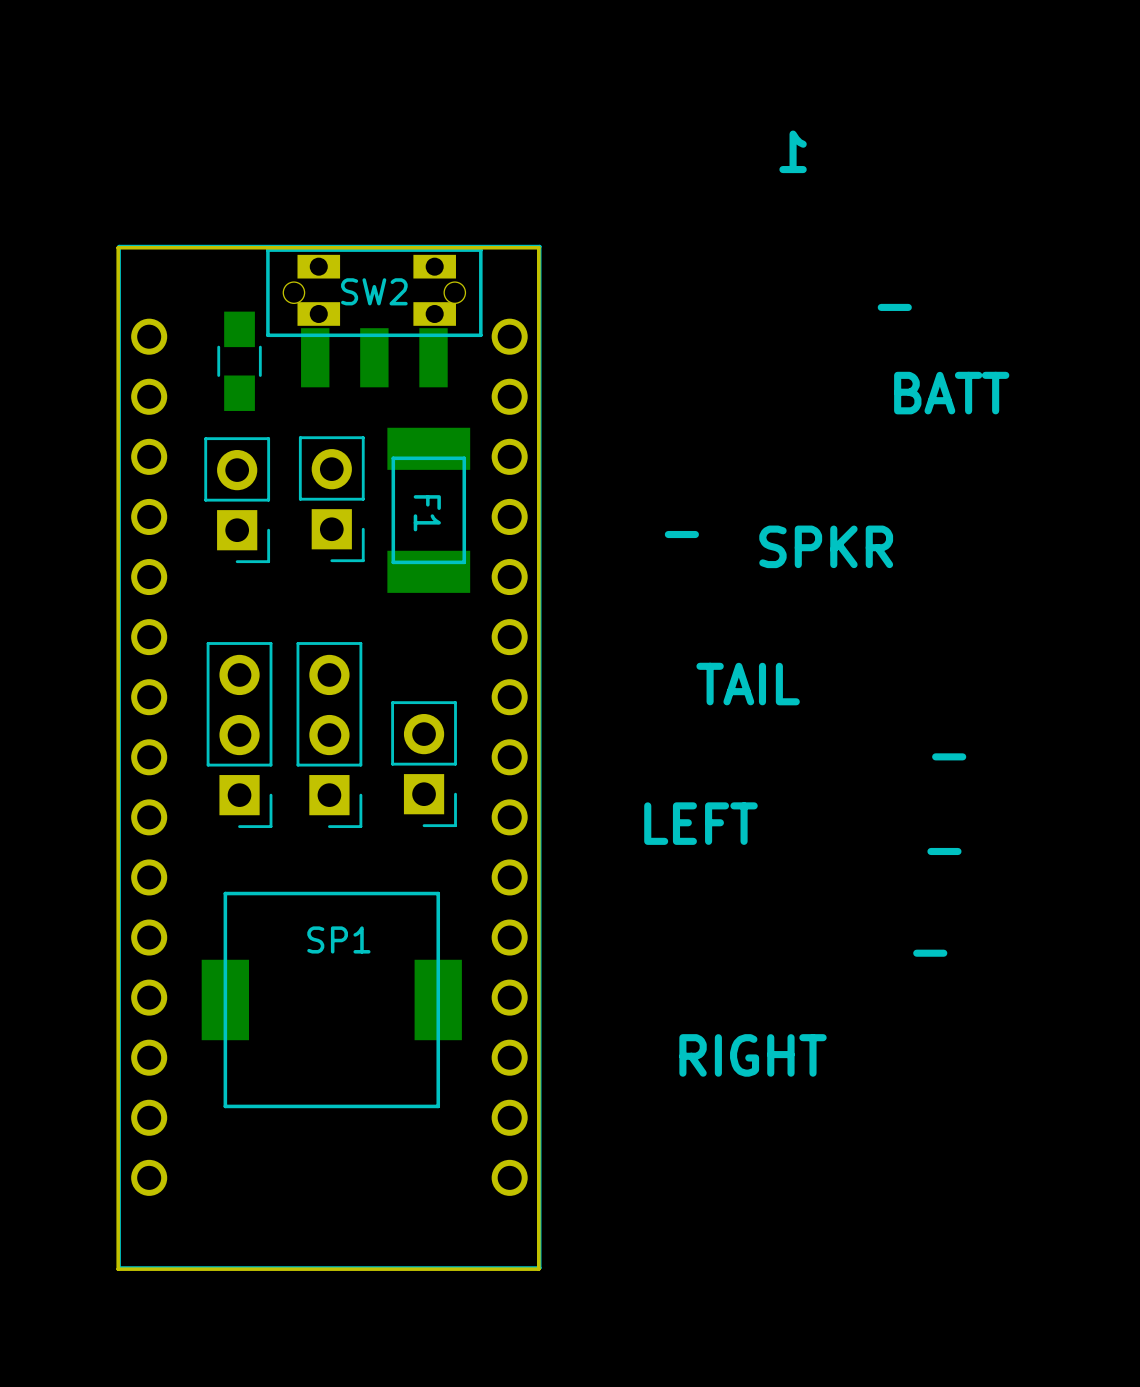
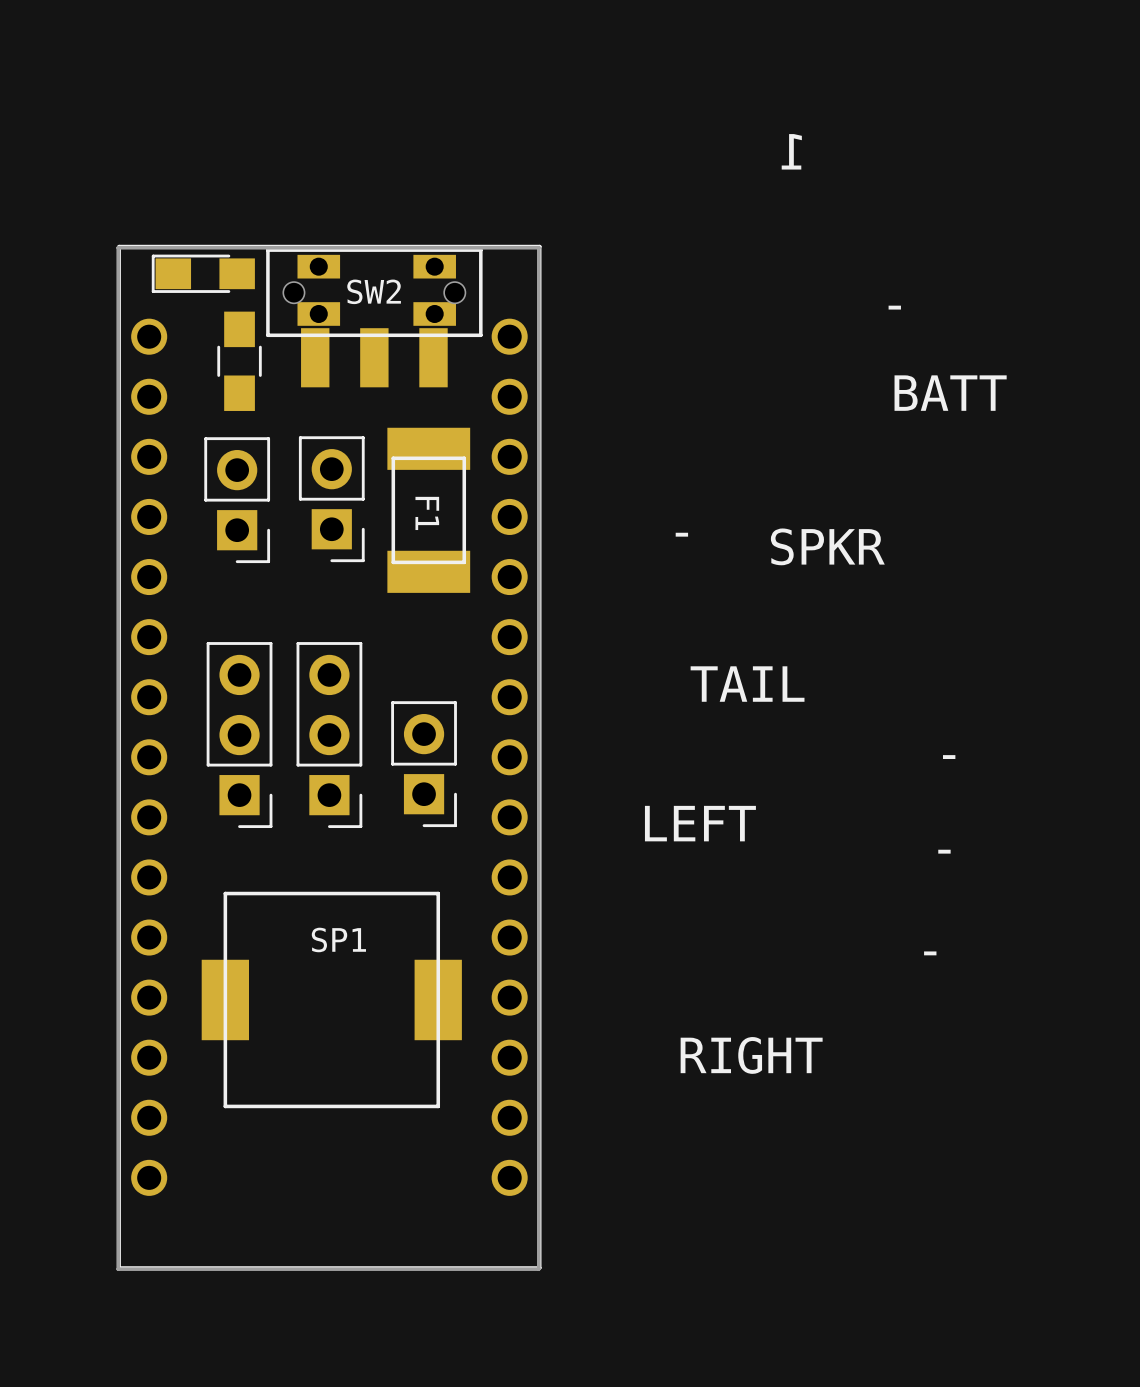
part: none -> (203, 273)

